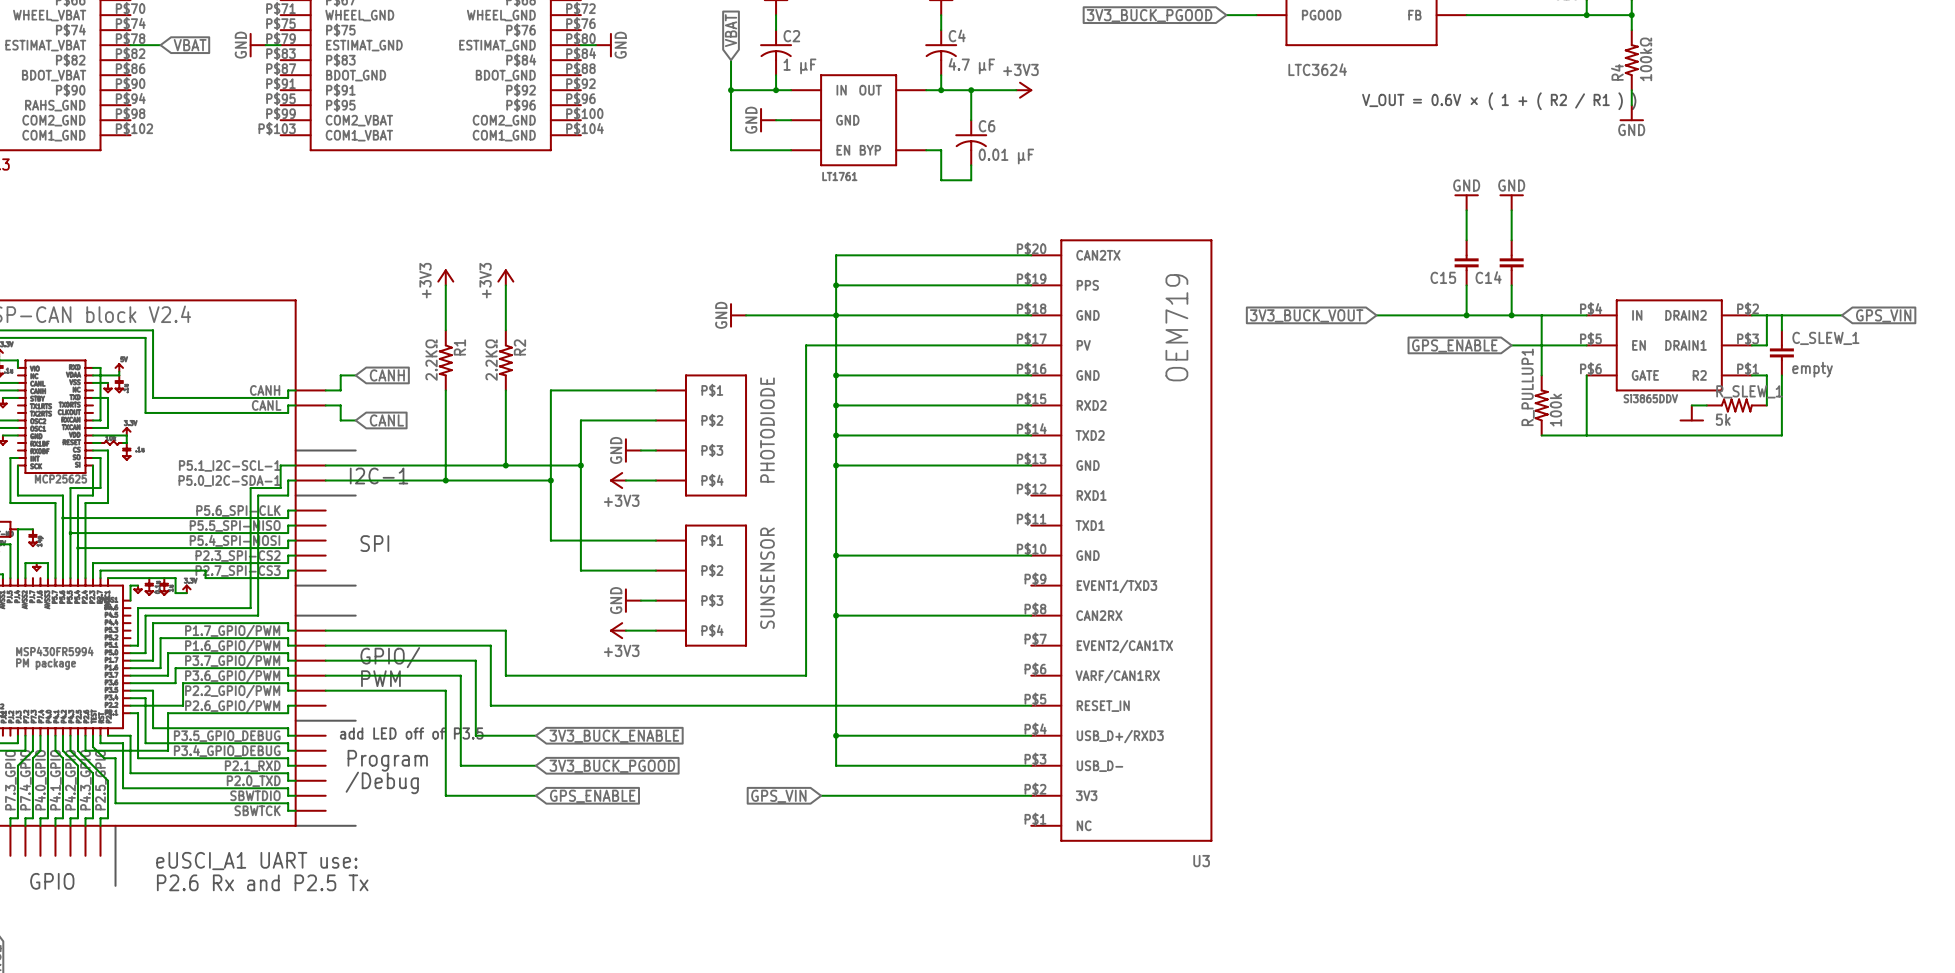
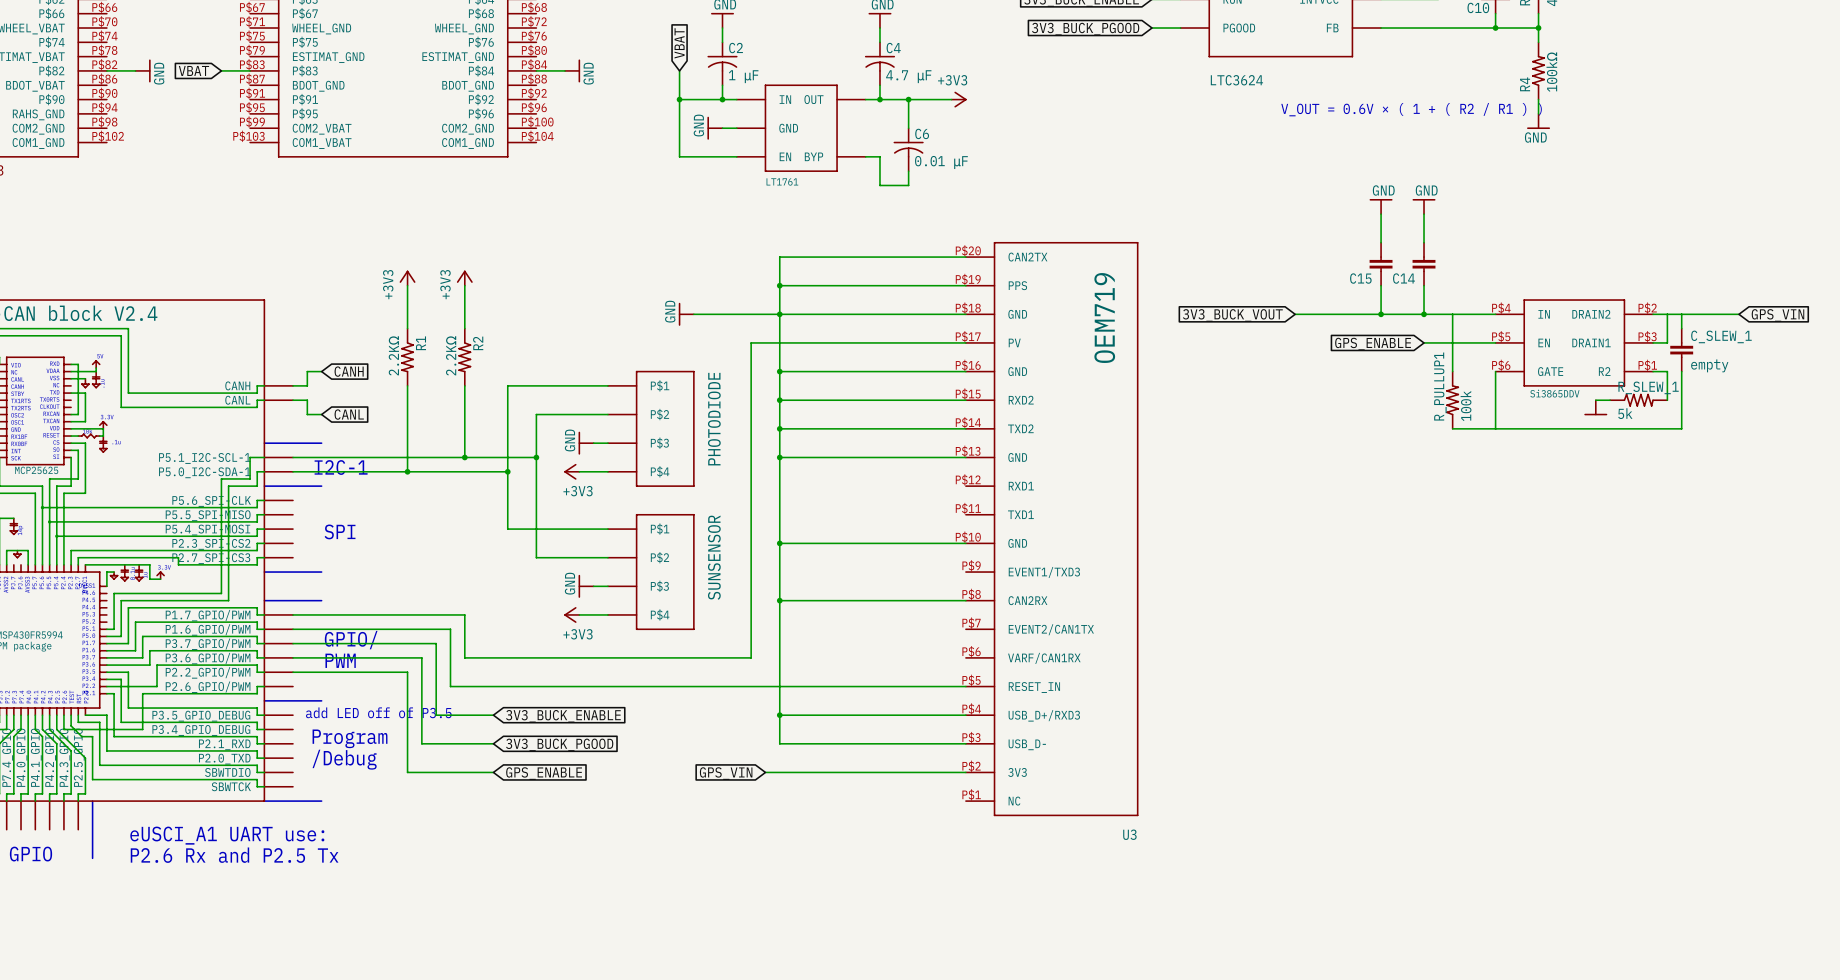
wire: (130, 45) (160, 45) -> (106, 70) (135, 70)
global label rotation: 0° (190, 45) -> 180° (193, 70)
power symbol rotation: 0° (250, 45) -> 180° (149, 70)
power symbol position: GND (257, 45) -> GND (143, 70)
wire: (265, 45) (280, 45) -> none
wire: (580, 45) (595, 45) -> none
power symbol position: GND (603, 45) -> GND (572, 70)
wire: none -> (221, 70) (250, 70)
wire: none -> (536, 70) (565, 70)

